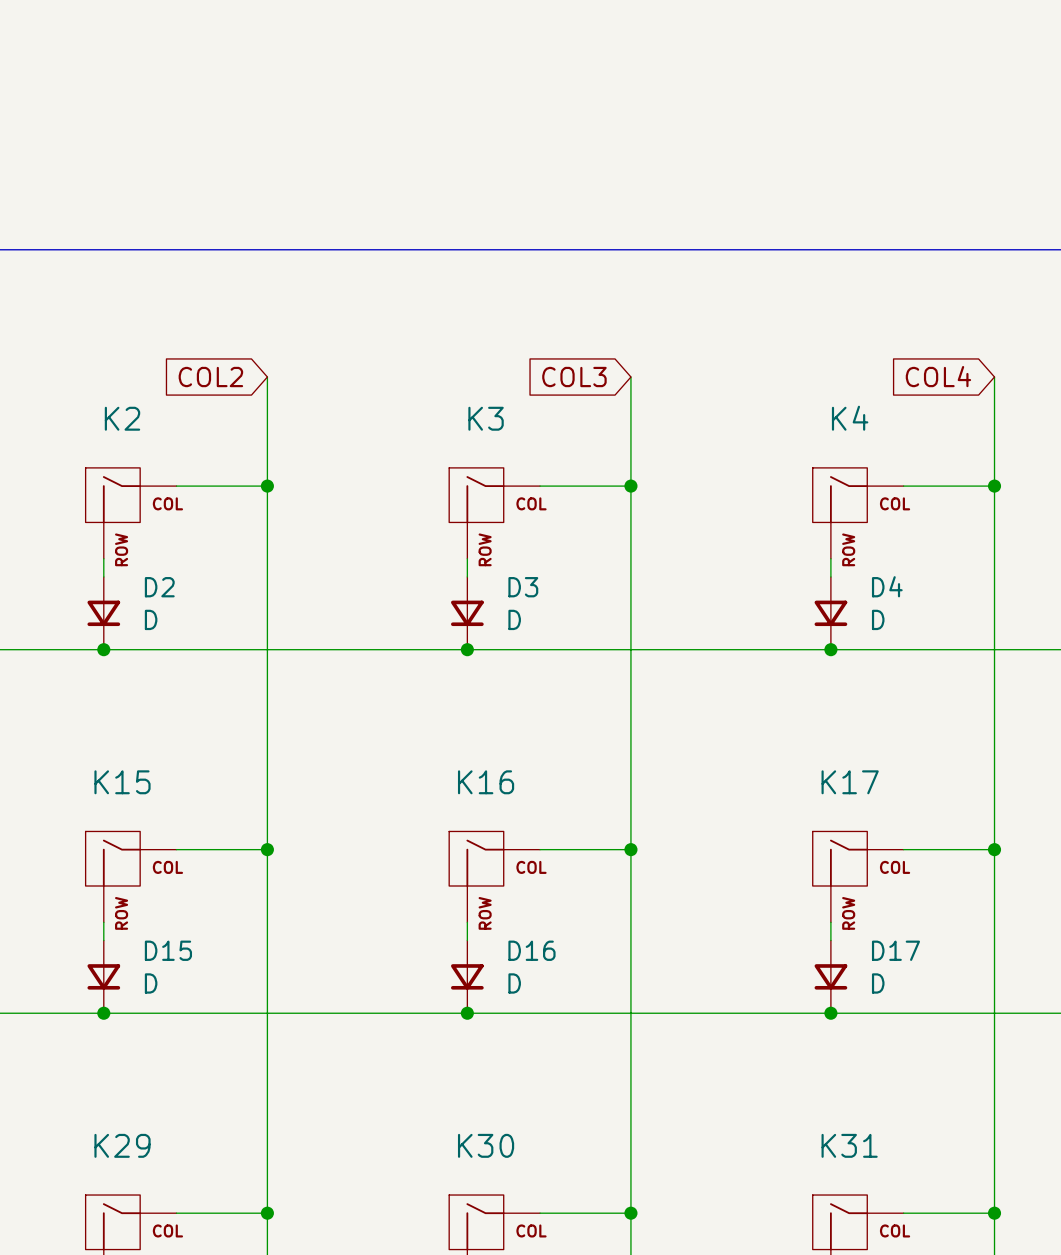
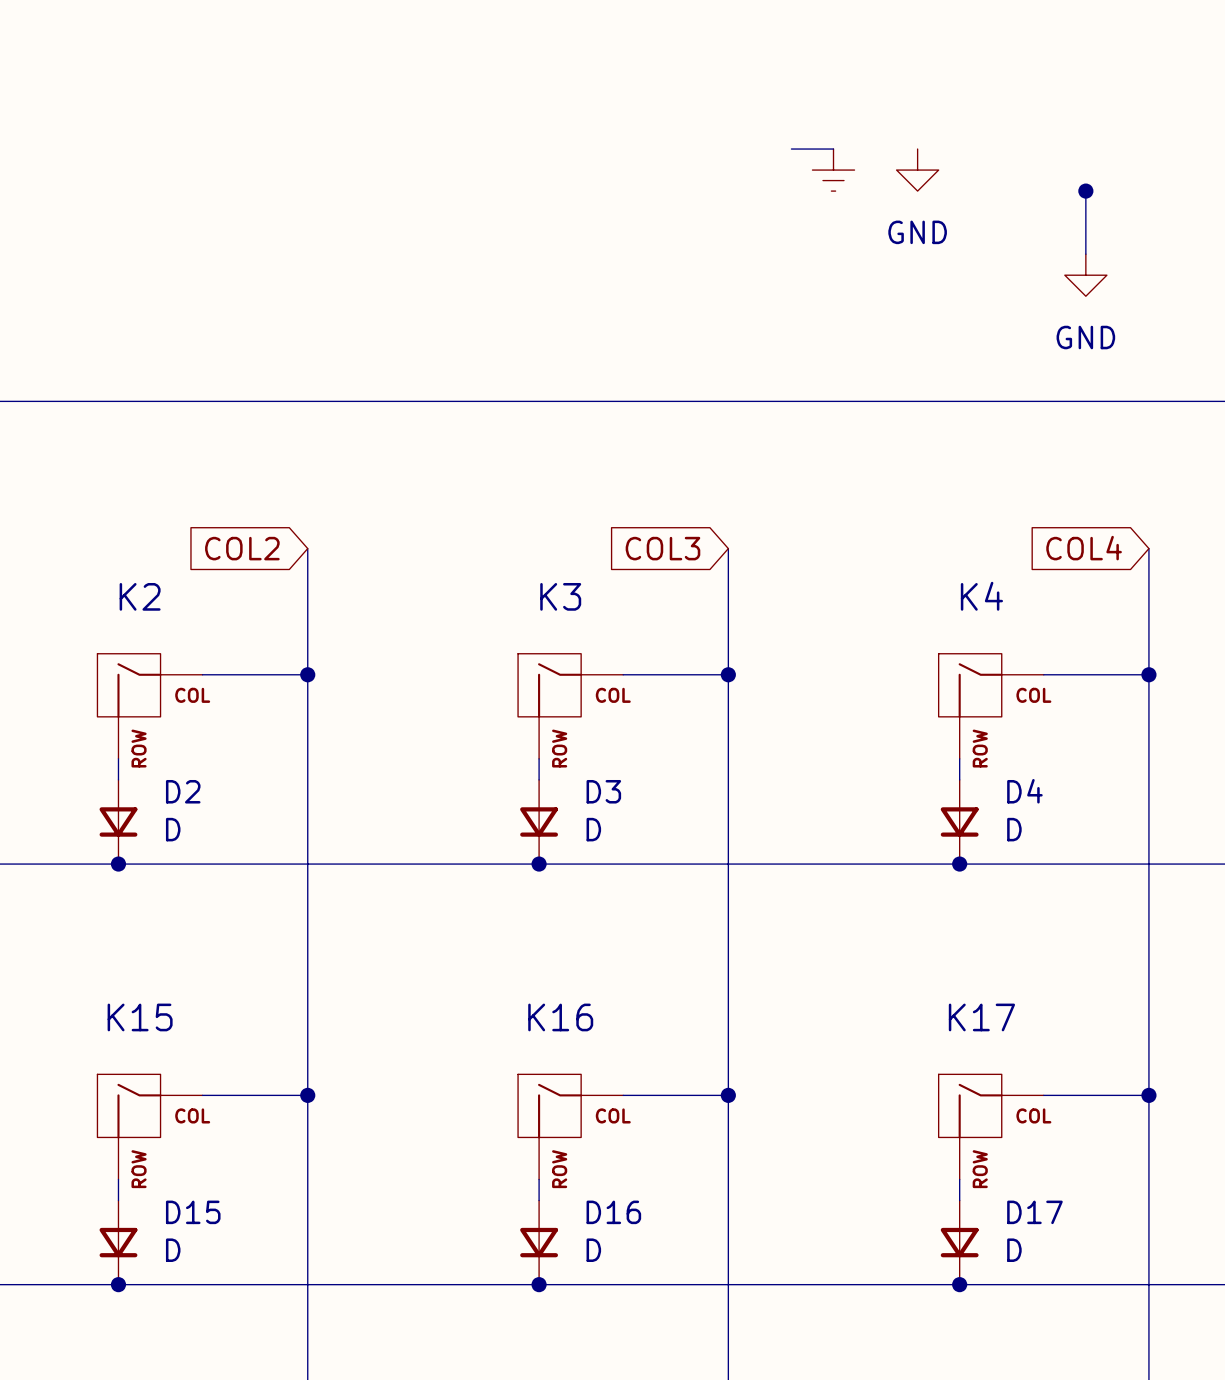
wire: none -> (791, 149) (833, 149)
power symbol: none -> (833, 170)
power symbol: none -> GND (917, 170)
wire: none -> (1085, 191) (1085, 254)
junction: none -> (1085, 191)
power symbol: none -> GND (1085, 275)

